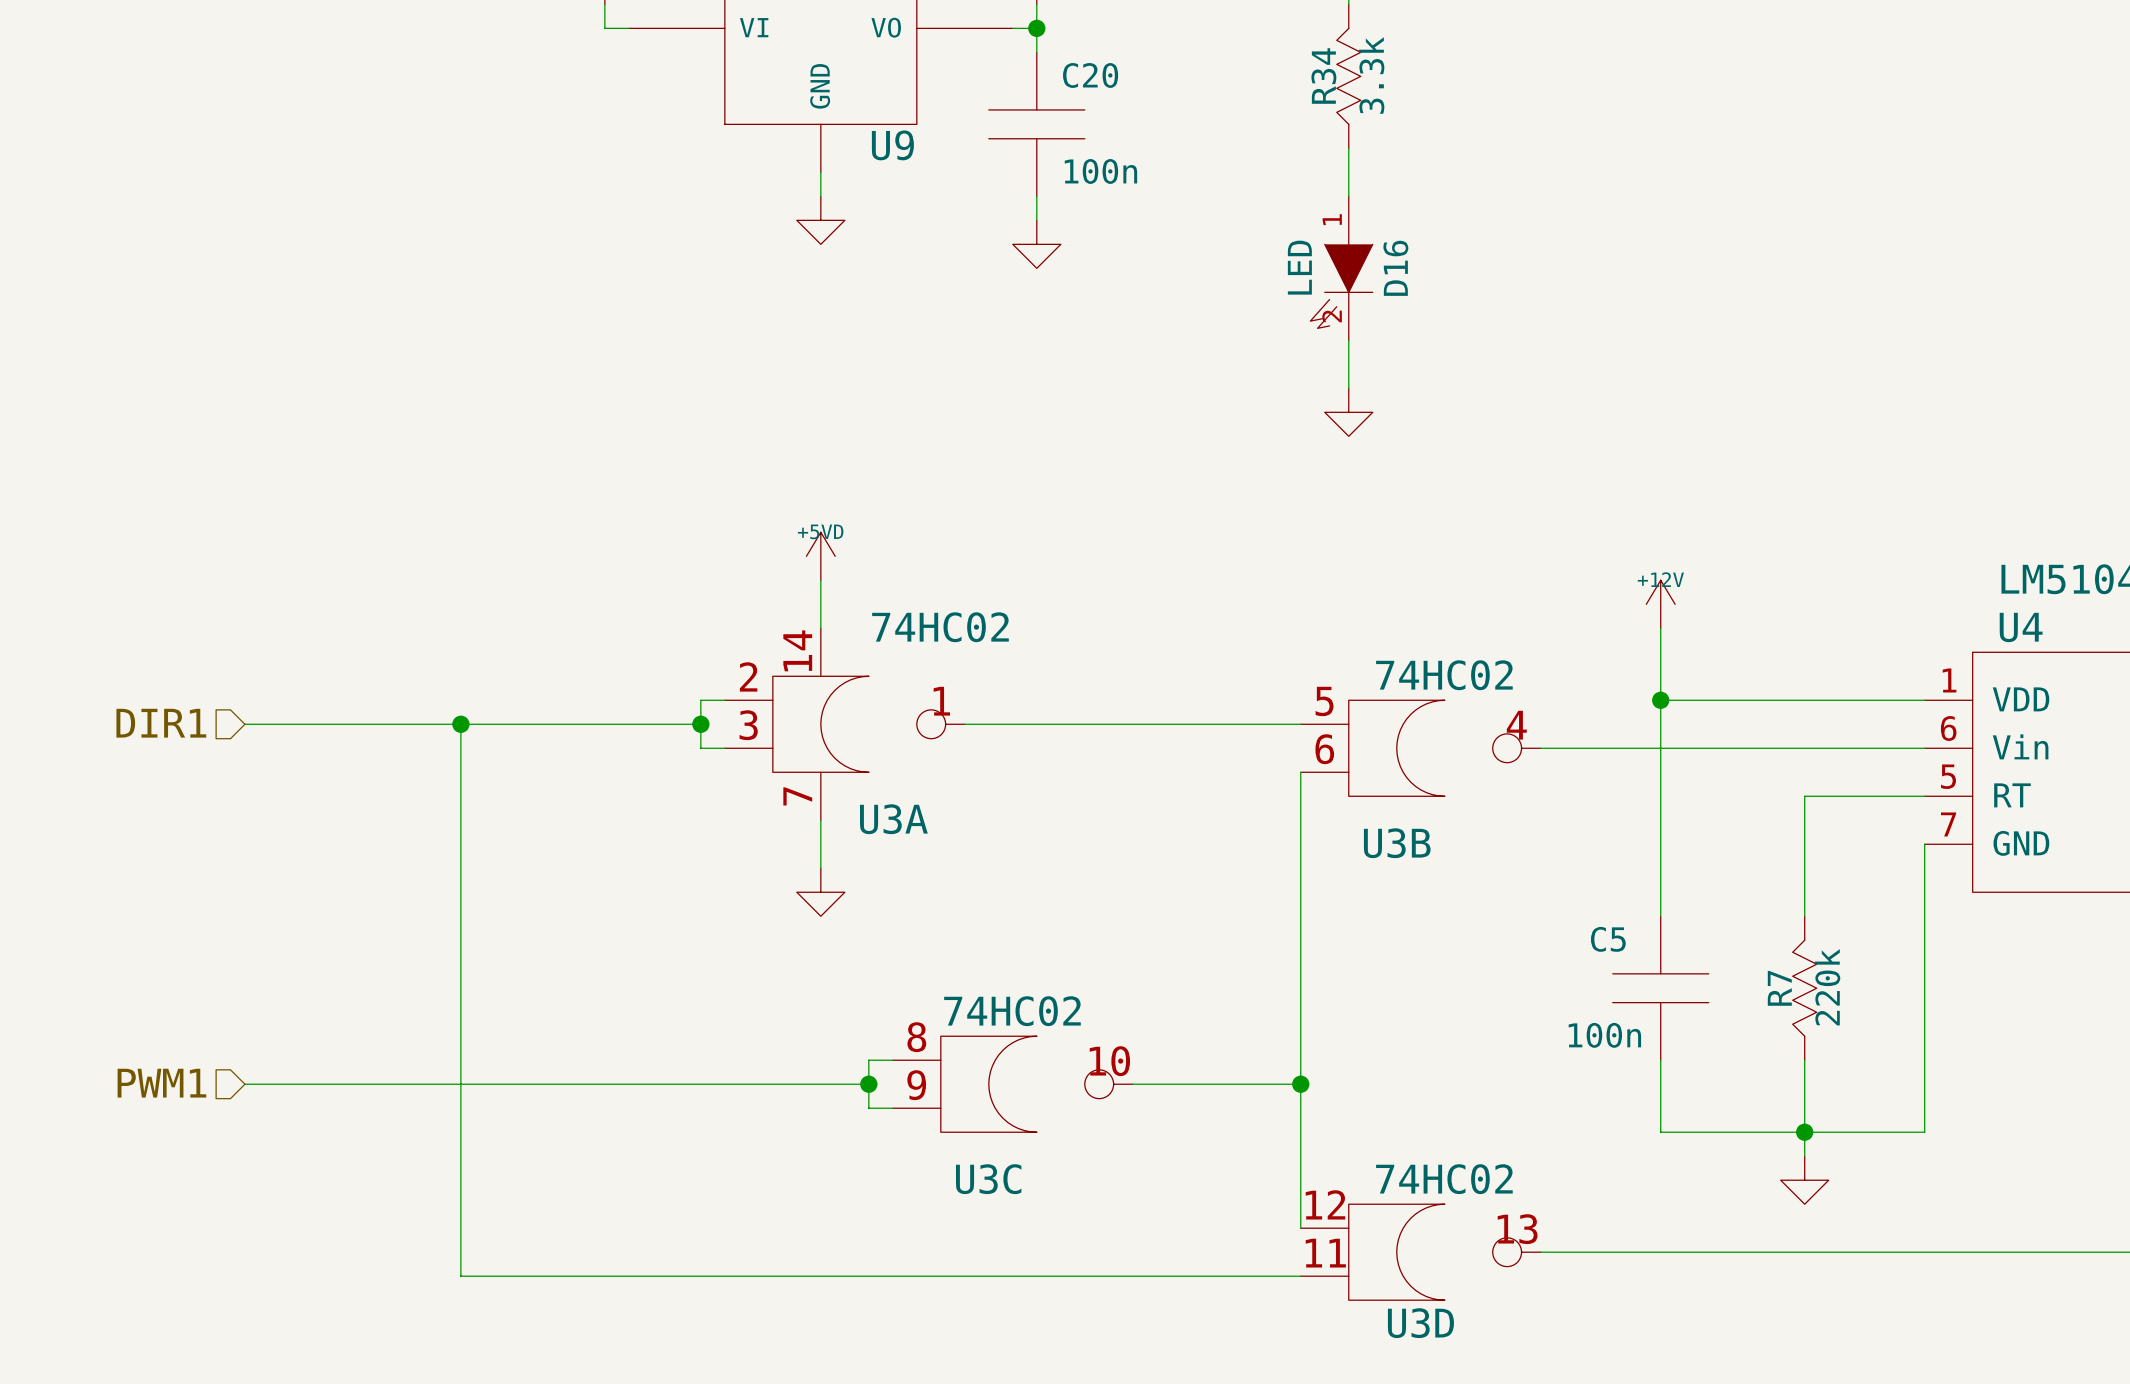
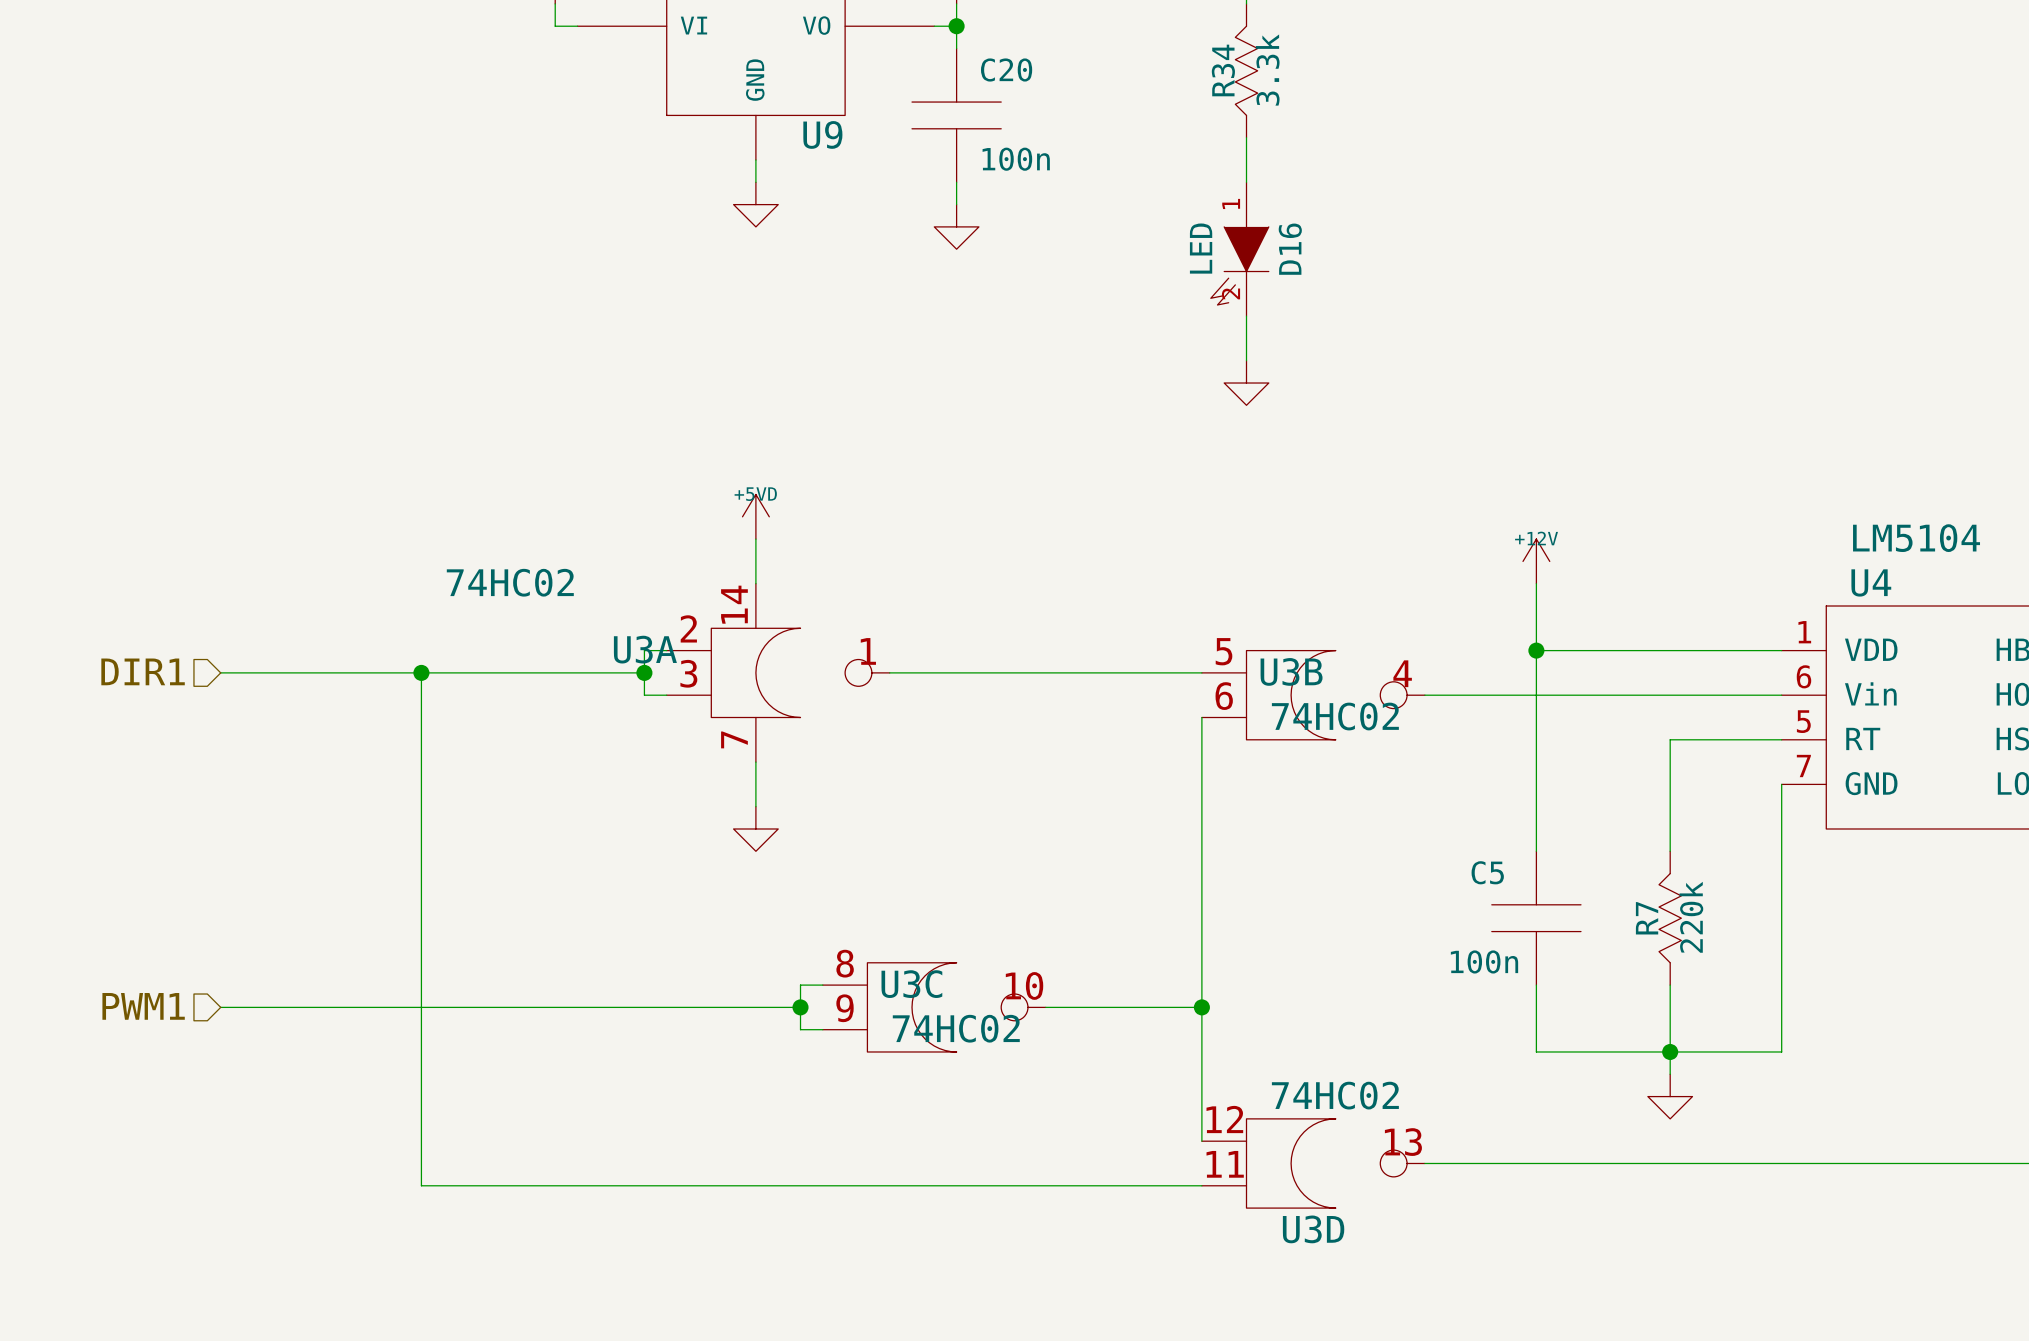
U3A value position: 74HC02 (940, 627) -> 74HC02 (510, 582)
U3B value position: 74HC02 (1444, 675) -> 74HC02 (1335, 716)
U3A name position: U3A (893, 819) -> U3A (645, 649)
U3B name position: U3B (1397, 843) -> U3B (1291, 671)
U3C value position: 74HC02 (1012, 1011) -> 74HC02 (956, 1028)
U3C name position: U3C (988, 1179) -> U3C (911, 984)

